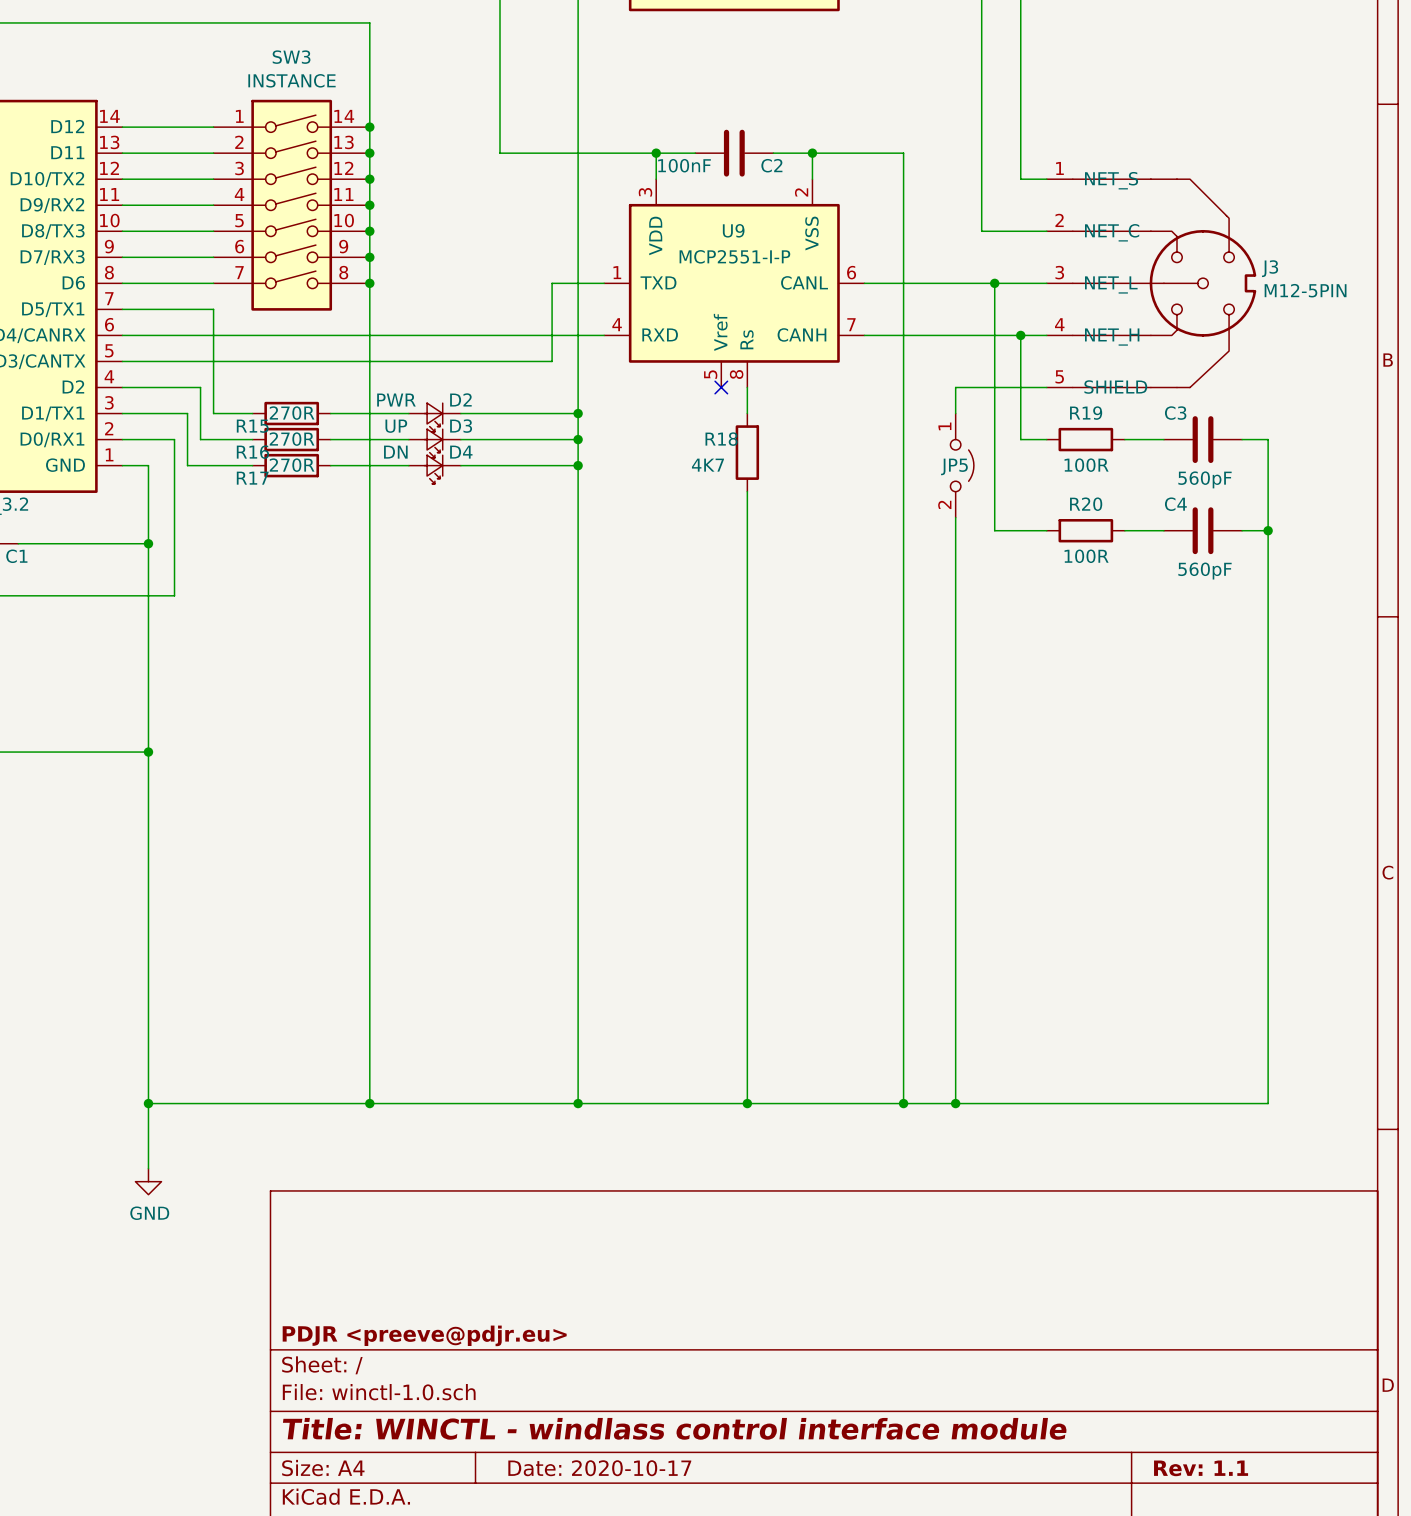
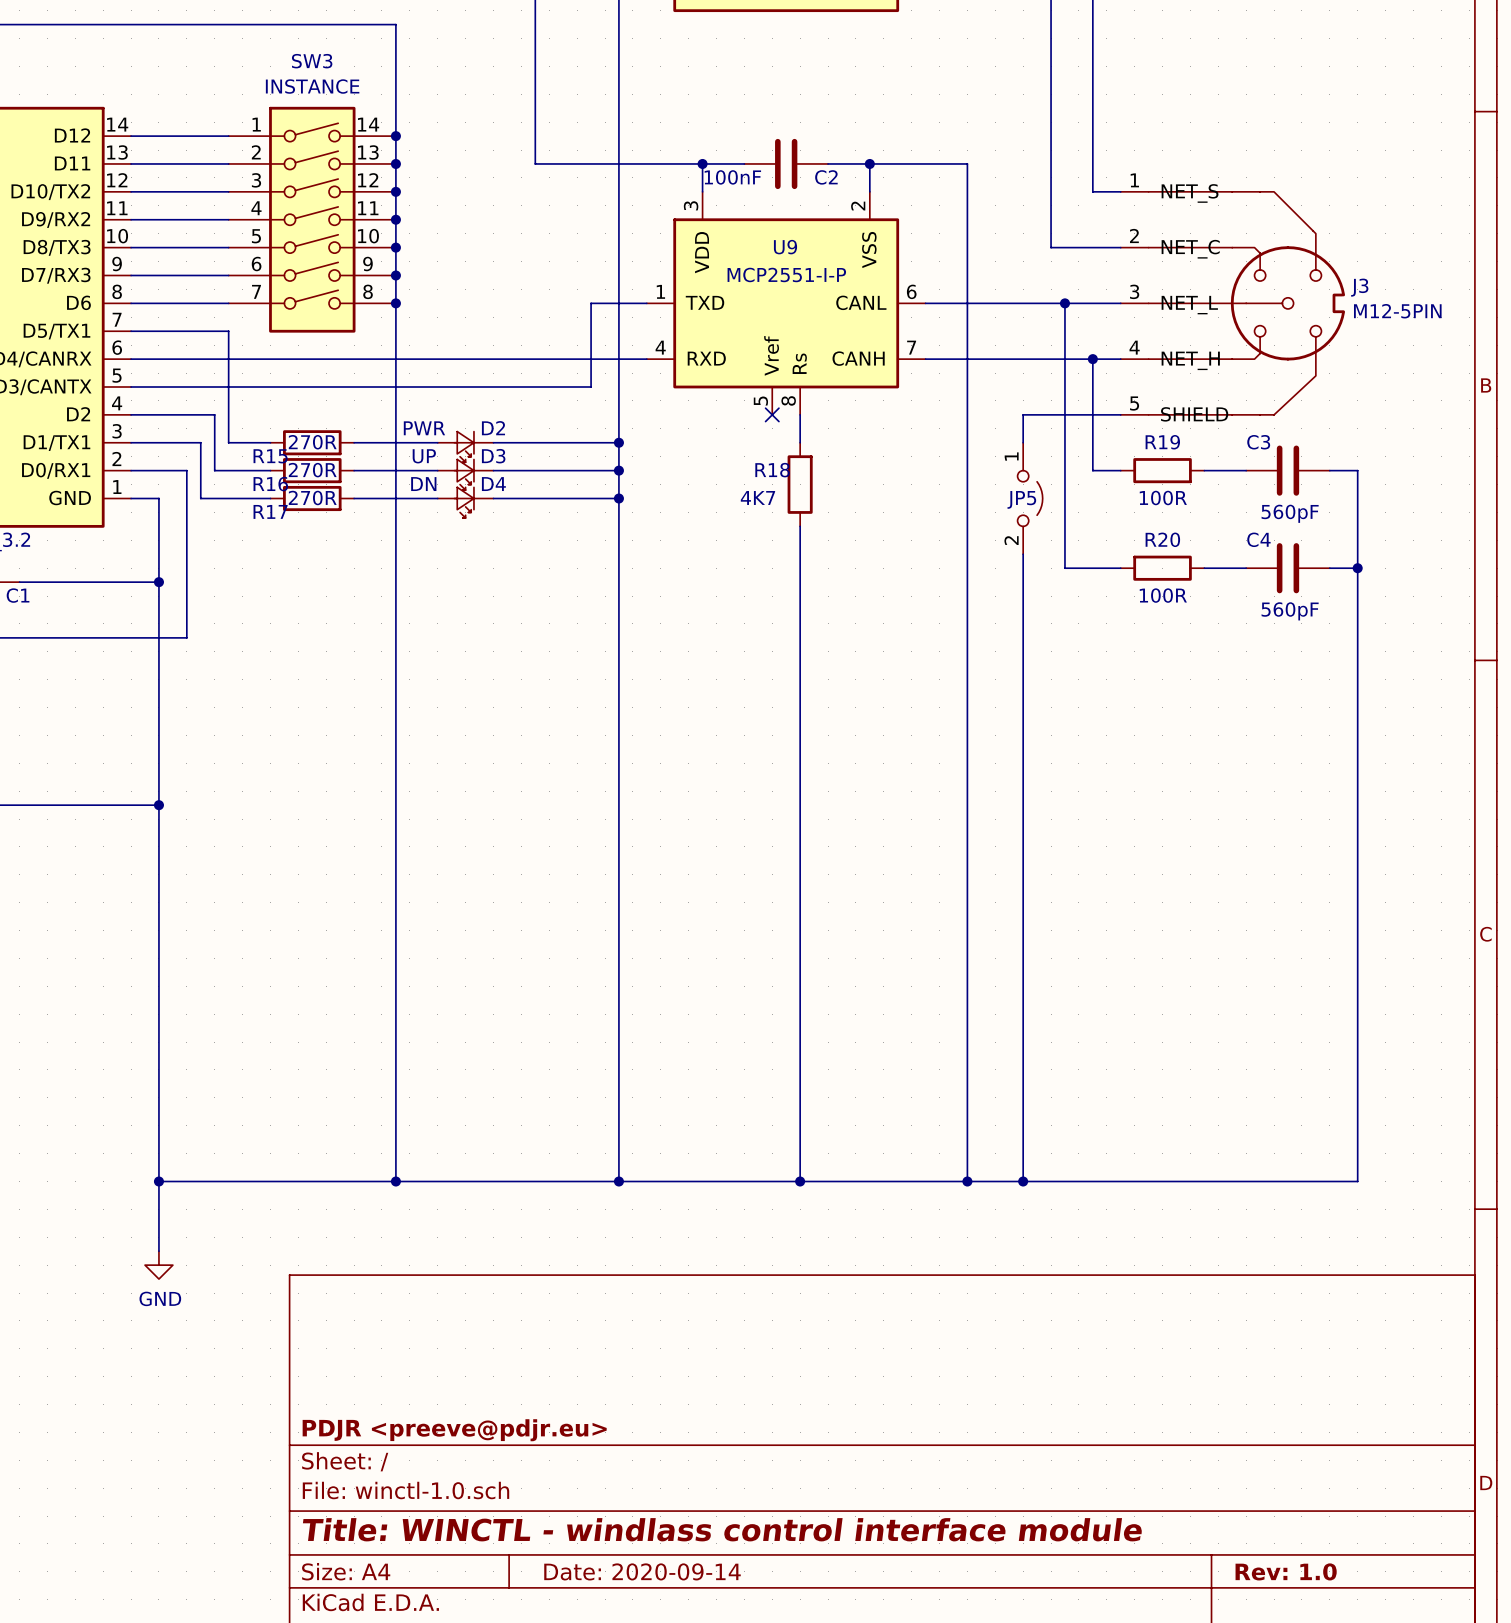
title block: Date: 2020-10-17 (599, 1468) -> Date: 2020-09-14 (642, 1571)
title block: Rev: 1.1 (1201, 1468) -> Rev: 1.0 (1286, 1571)

